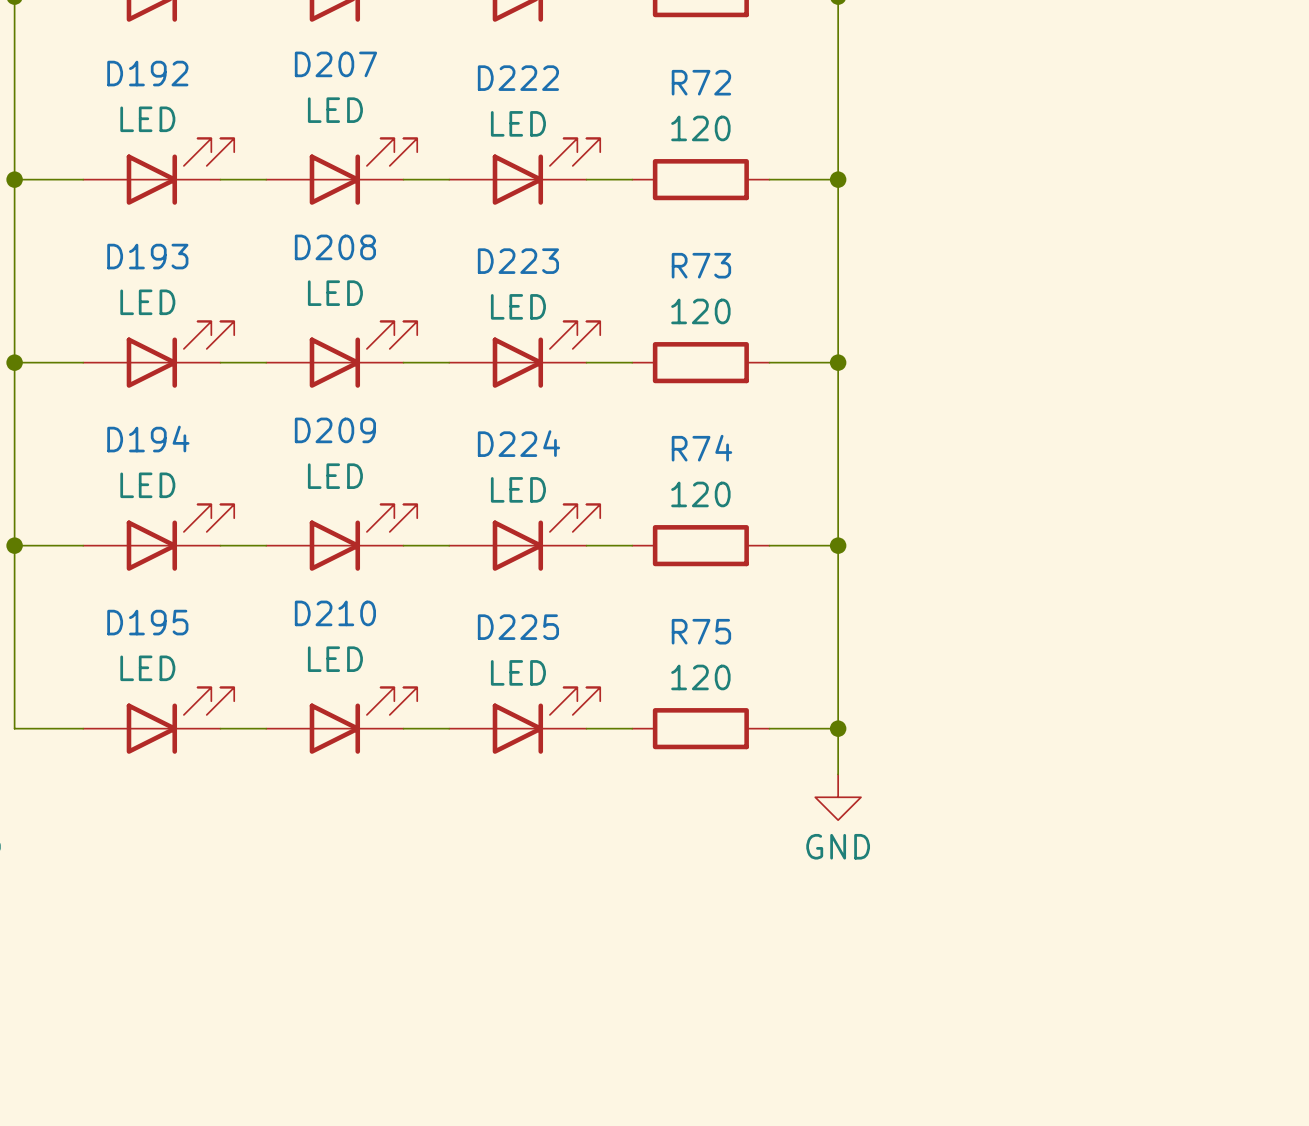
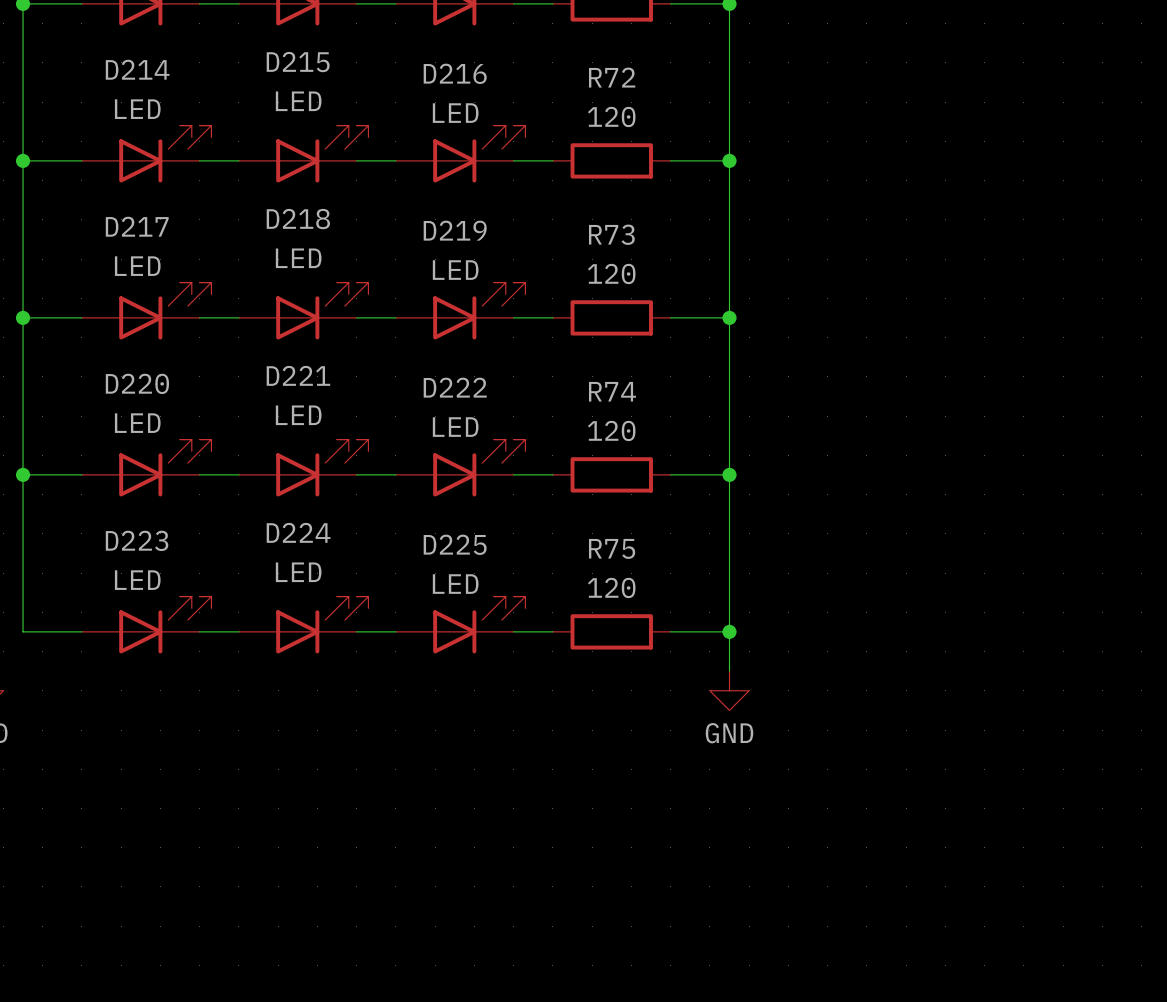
D207 name: D207 (335, 64) -> D215 (298, 62)
D192 name: D192 (147, 73) -> D214 (137, 69)
D222 name: D222 (518, 78) -> D216 (455, 73)
D208 name: D208 (335, 247) -> D218 (298, 219)
D193 name: D193 (147, 256) -> D217 (137, 226)
D223 name: D223 (518, 261) -> D219 (455, 230)
D209 name: D209 (335, 430) -> D221 (298, 375)
D194 name: D194 (148, 439) -> D220 (137, 383)
D224 name: D224 (518, 443) -> D222 (455, 387)
D210 name: D210 (335, 613) -> D224 (298, 532)
D195 name: D195 (147, 622) -> D223 (137, 540)

